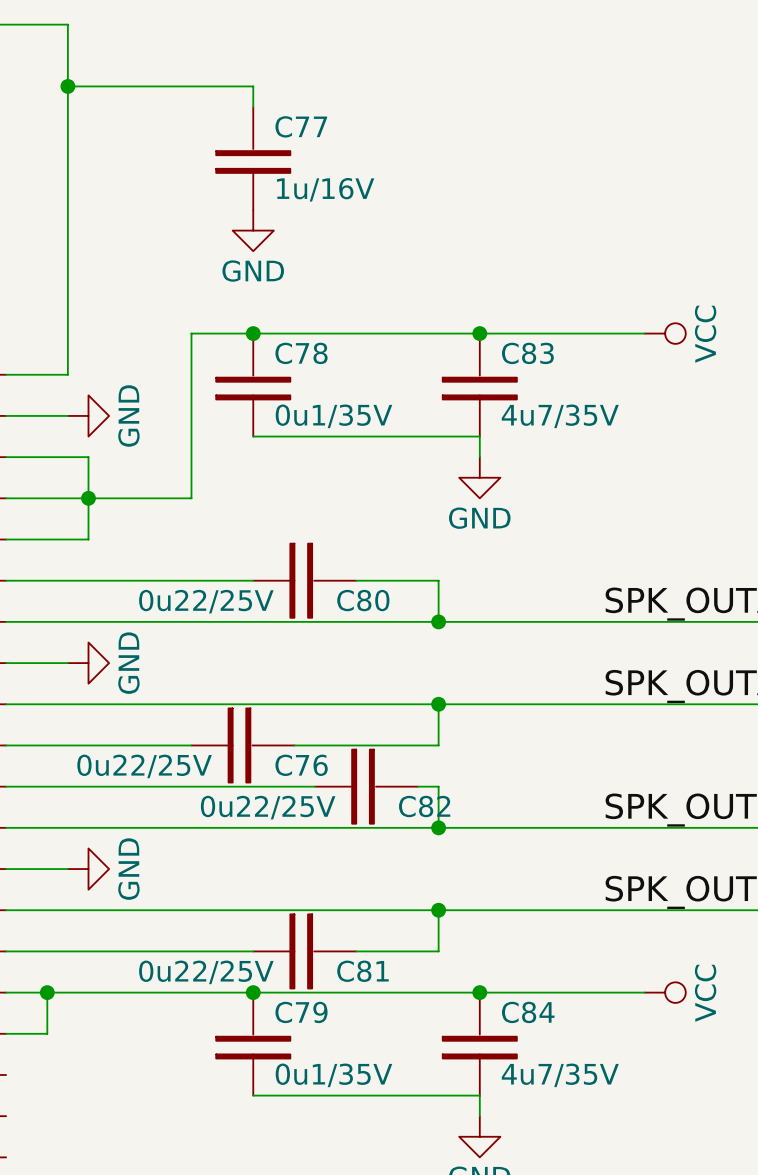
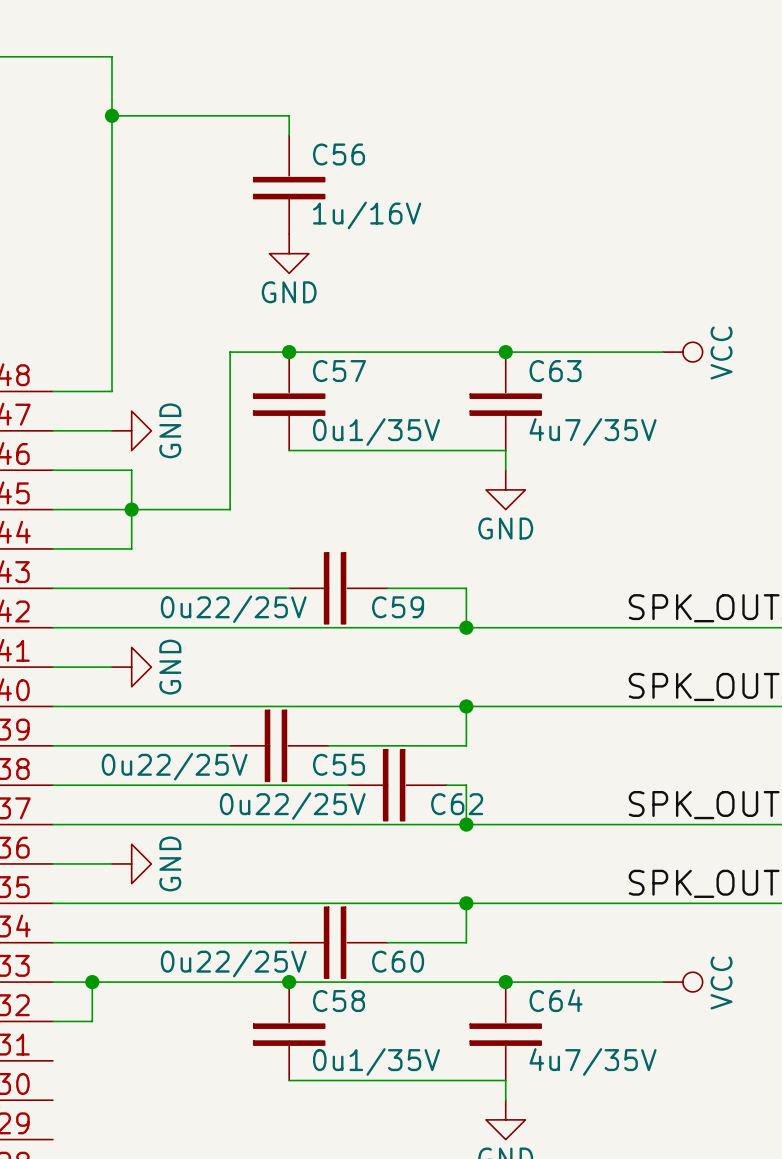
C77 name: C77 (301, 126) -> C56 (339, 154)
C78 name: C78 (301, 353) -> C57 (339, 371)
C83 name: C83 (527, 353) -> C63 (555, 371)
C80 name: C80 (363, 600) -> C59 (398, 607)
C76 name: C76 (301, 765) -> C55 (339, 764)
C82 name: C82 (424, 806) -> C62 (457, 804)
C81 name: C81 (362, 971) -> C60 (398, 961)
C79 name: C79 (301, 1012) -> C58 (339, 1001)
C84 name: C84 (528, 1012) -> C64 (556, 1000)

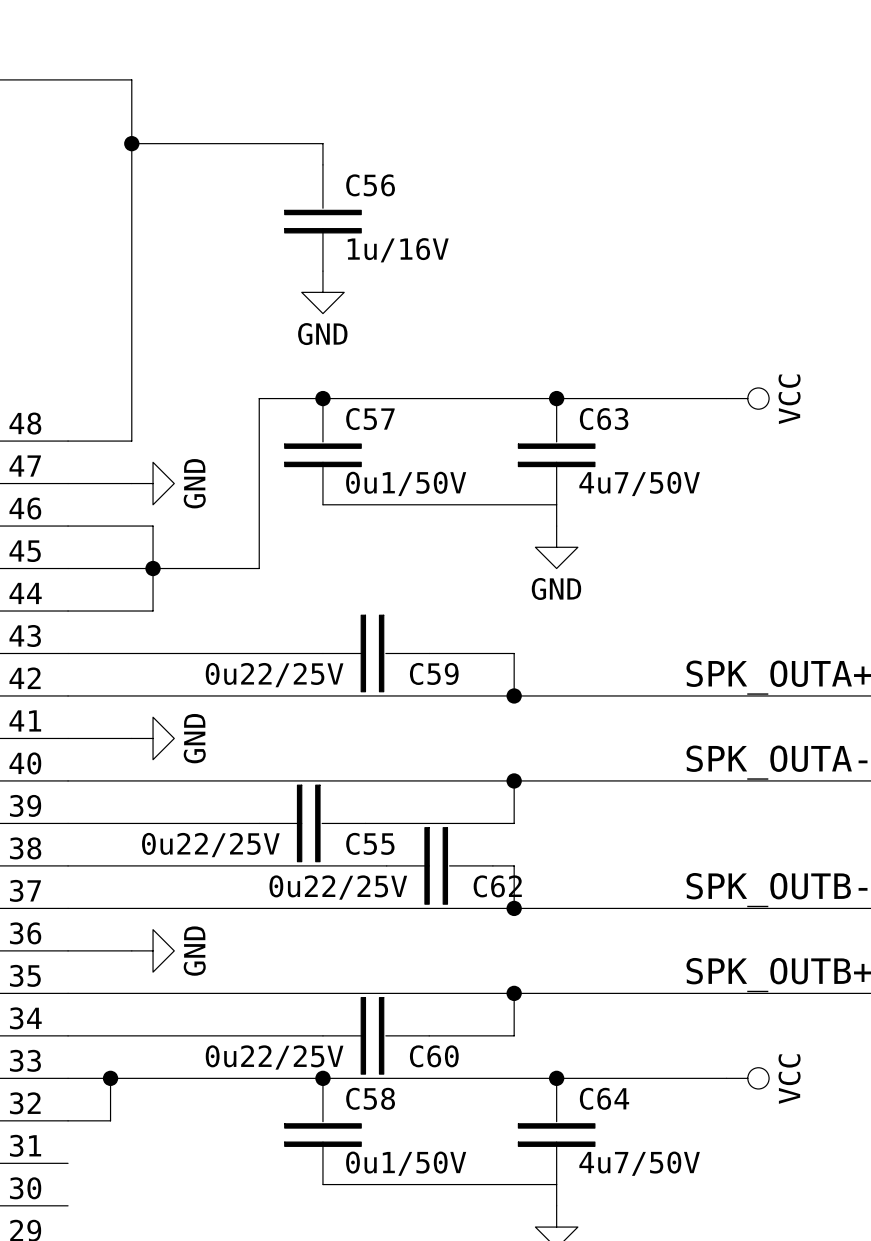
C57 value: 0u1/35V (376, 431) -> 0u1/50V (406, 483)
C63 value: 4u7/35V (593, 431) -> 4u7/50V (639, 483)
C58 value: 0u1/35V (376, 1061) -> 0u1/50V (406, 1163)
C64 value: 4u7/35V (593, 1061) -> 4u7/50V (639, 1163)

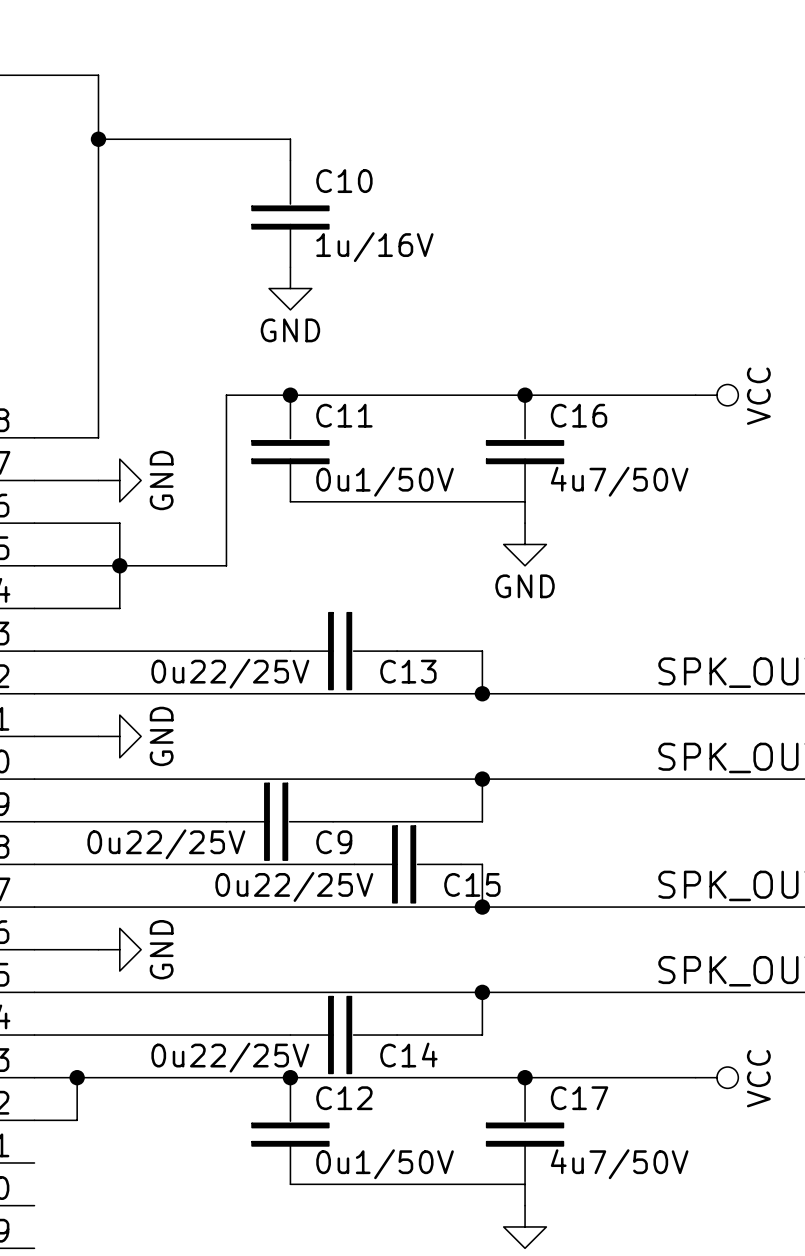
C56 name: C56 (370, 185) -> C10 (344, 181)
C57 name: C57 (370, 419) -> C11 (344, 415)
C63 name: C63 (604, 419) -> C16 (579, 415)
C59 name: C59 (434, 673) -> C13 (408, 671)
C55 name: C55 (370, 843) -> C9 (334, 842)
C62 name: C62 (497, 886) -> C15 (472, 884)
C60 name: C60 (434, 1056) -> C14 (408, 1055)
C58 name: C58 (370, 1098) -> C12 (344, 1098)
C64 name: C64 (604, 1098) -> C17 (579, 1098)

